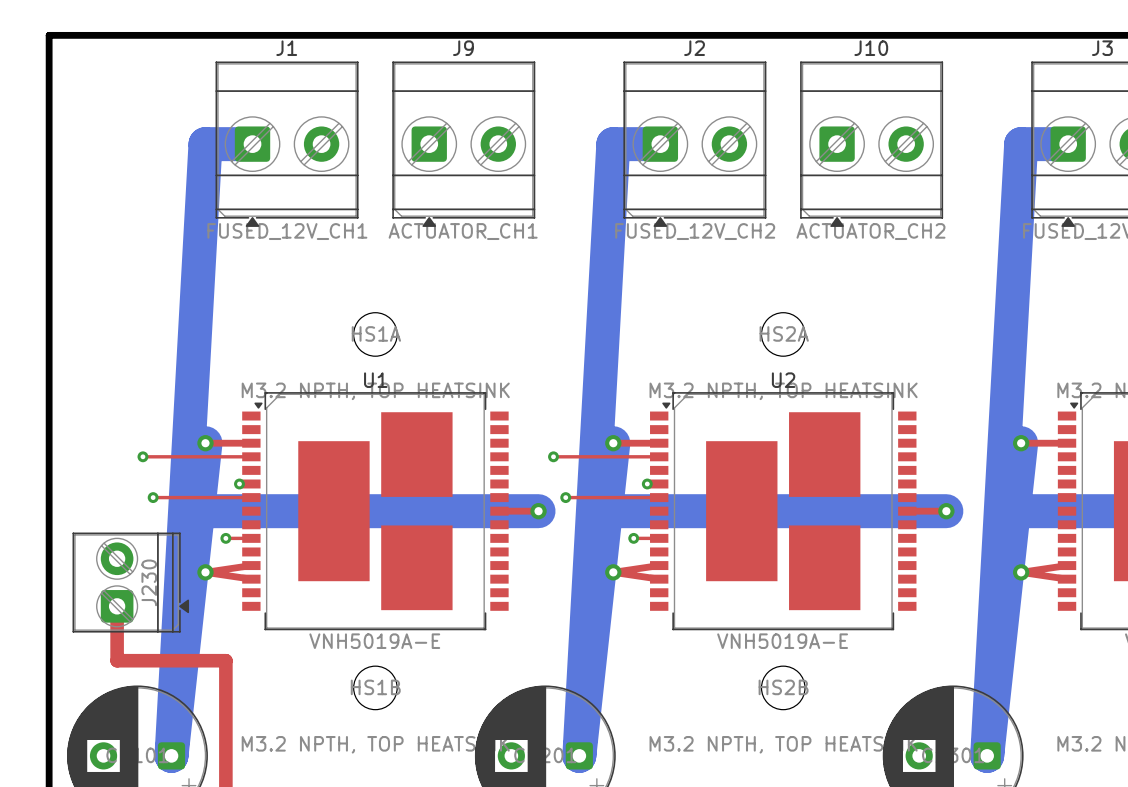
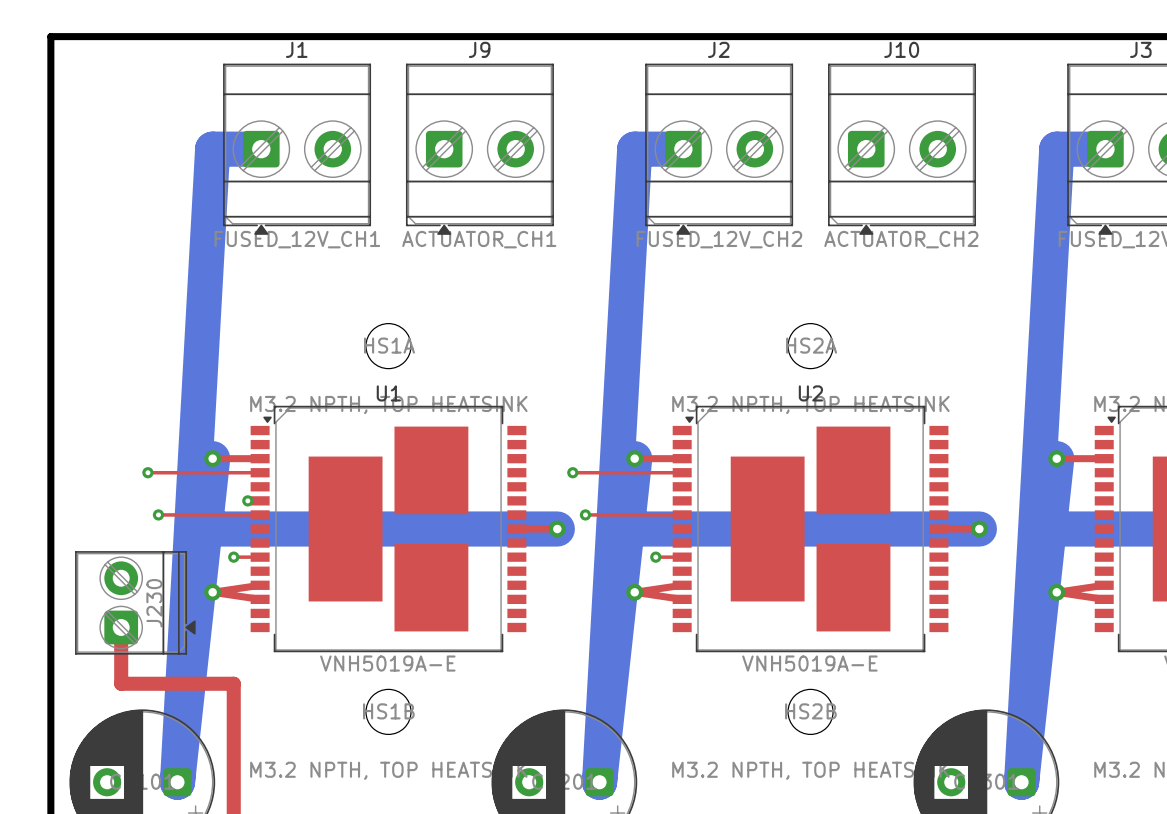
via: (647, 483) -> none

